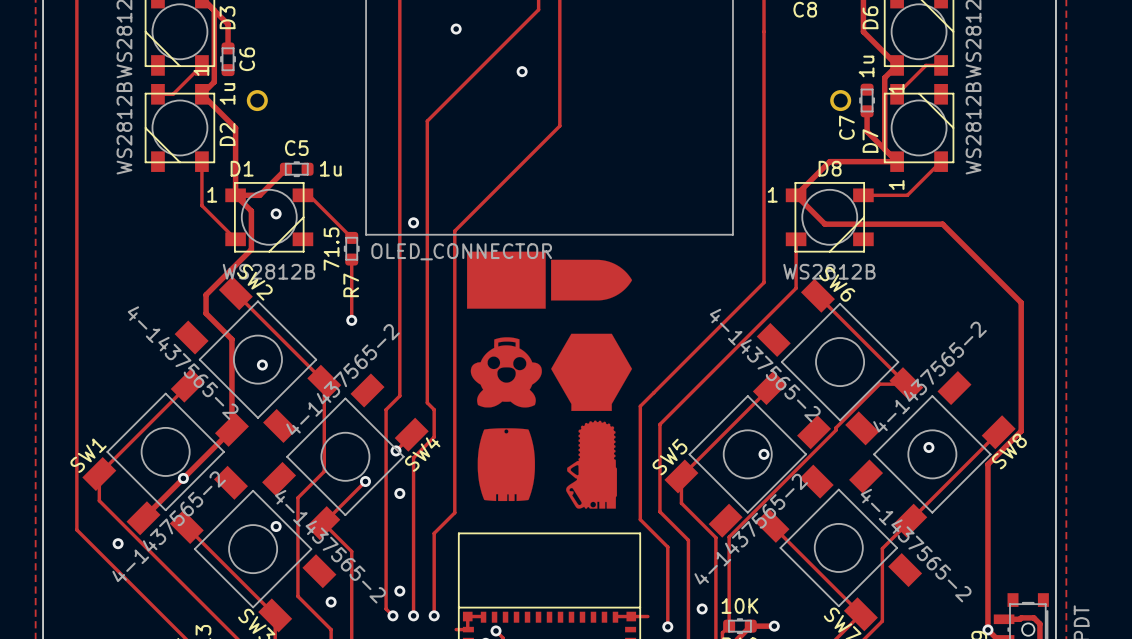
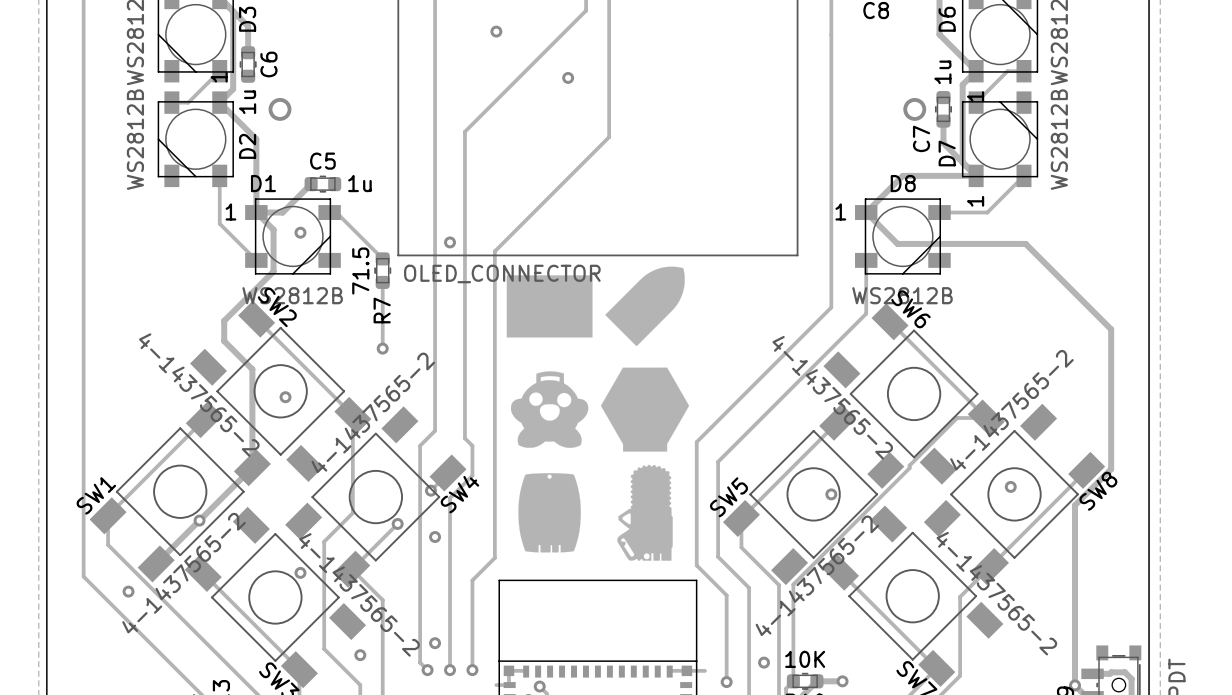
drawing shape: [467, 251, 633, 509] -> [506, 266, 690, 561]

